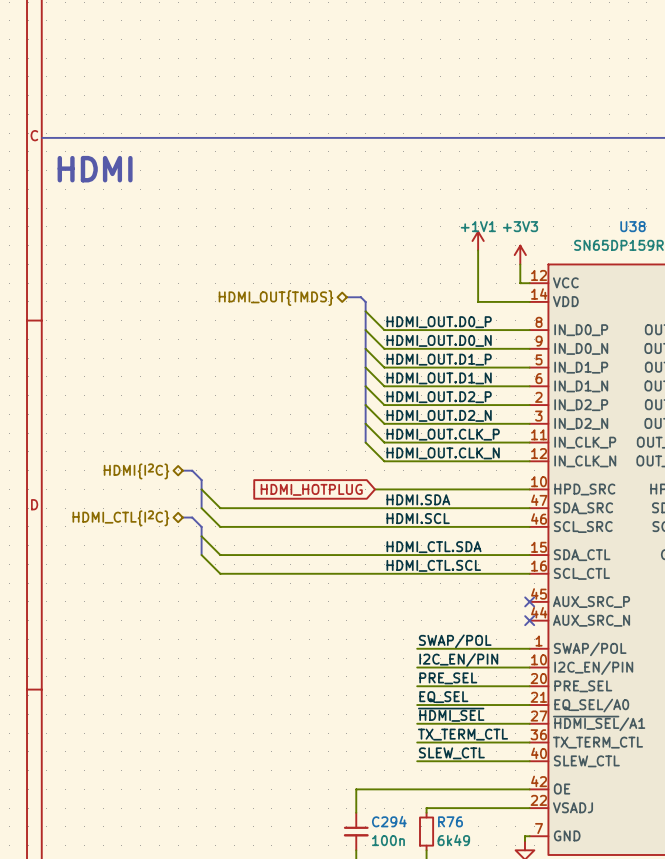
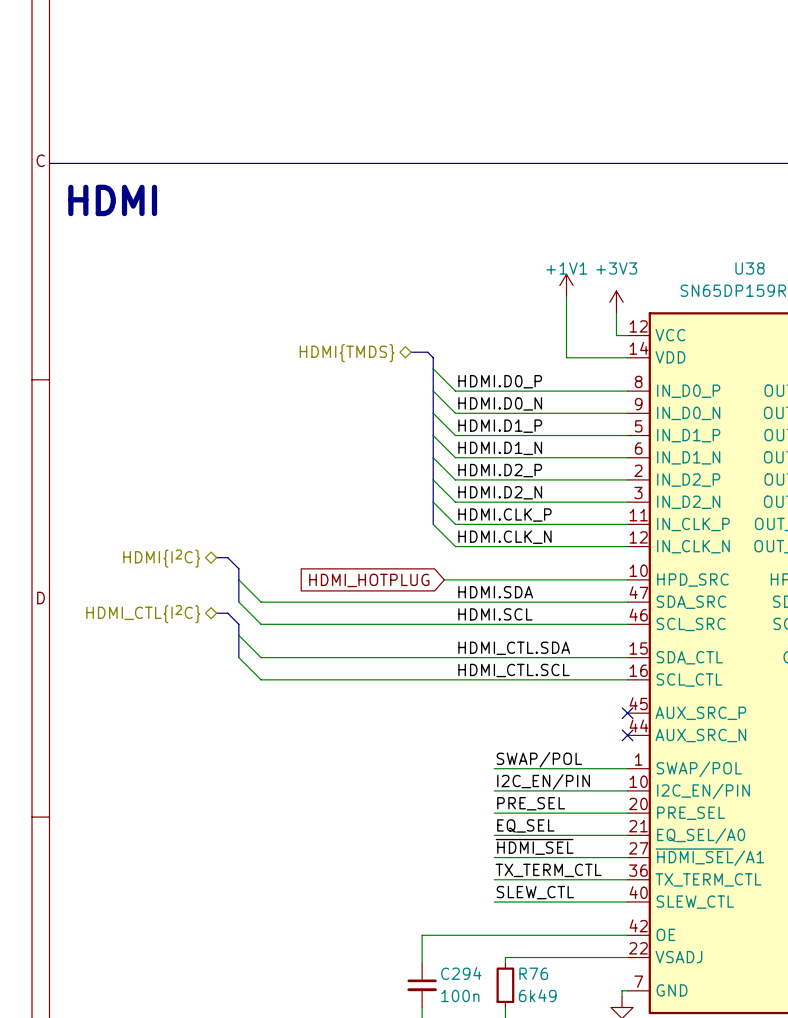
hierarchical label: HDMI_OUT{TMDS} (275, 298) -> HDMI{TMDS} (347, 353)
label: HDMI_OUT.D0_P (439, 322) -> HDMI.D0_P (500, 381)
label: HDMI_OUT.D0_N (439, 340) -> HDMI.D0_N (500, 403)
label: HDMI_OUT.D1_P (439, 359) -> HDMI.D1_P (500, 426)
label: HDMI_OUT.D1_N (439, 378) -> HDMI.D1_N (500, 448)
label: HDMI_OUT.D2_P (439, 397) -> HDMI.D2_P (500, 470)
label: HDMI_OUT.D2_N (439, 415) -> HDMI.D2_N (500, 492)
label: HDMI_OUT.CLK_P (443, 434) -> HDMI.CLK_P (504, 514)
label: HDMI_OUT.CLK_N (443, 453) -> HDMI.CLK_N (504, 537)

